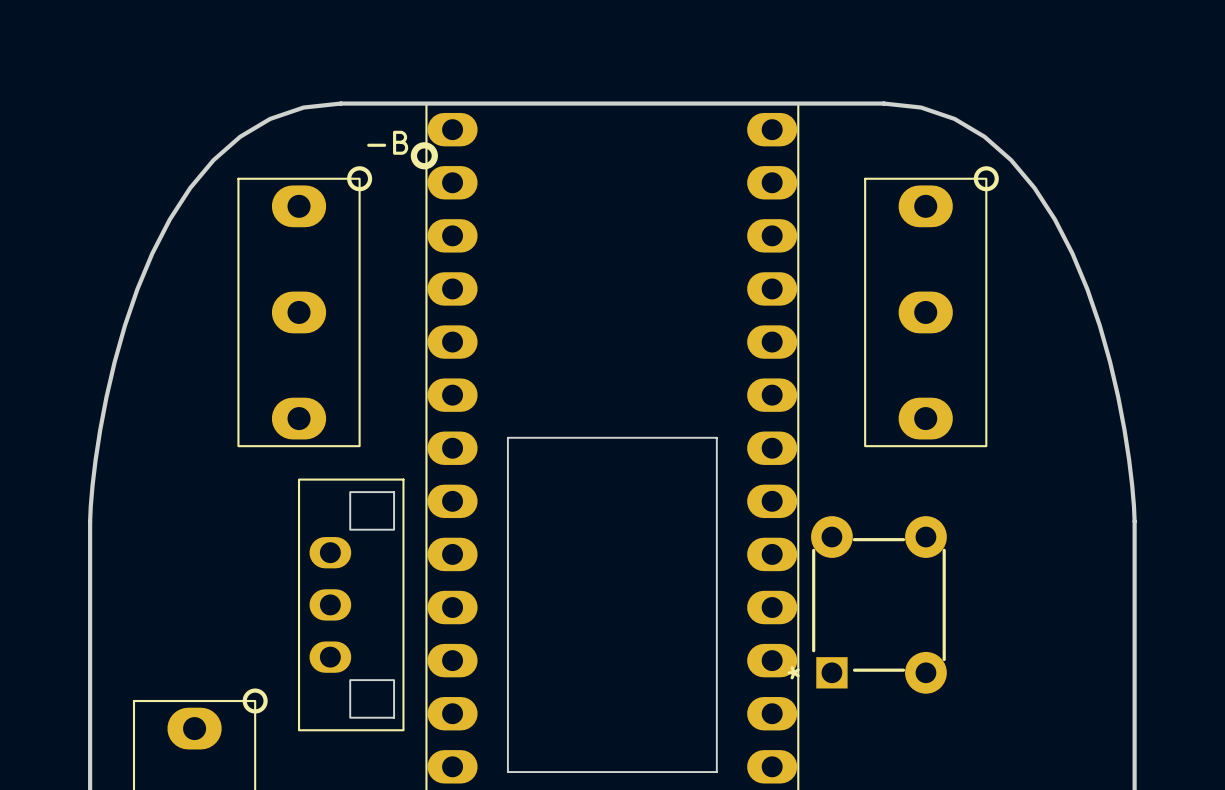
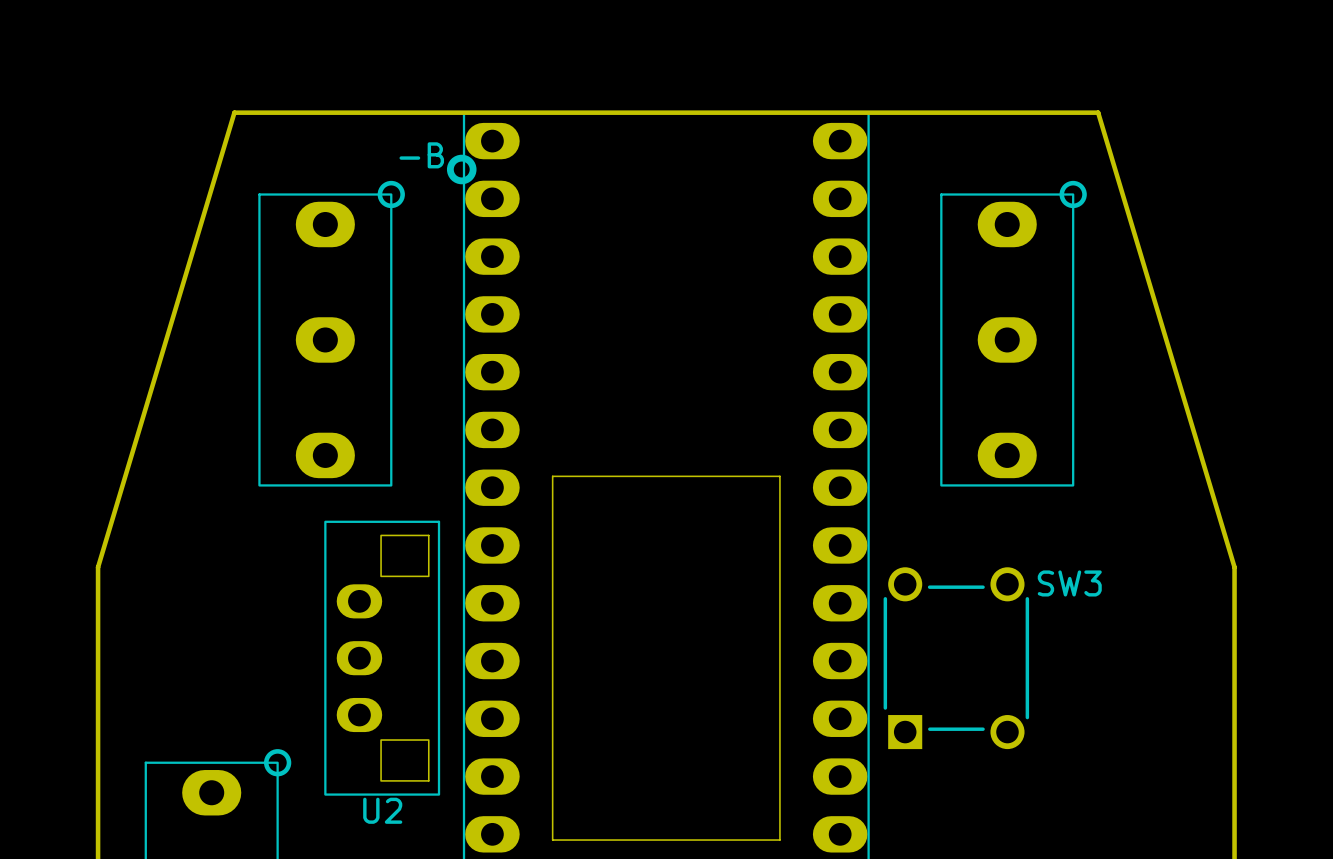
board edge: (340, 103) (303, 107) (270, 118) (240, 136) (213, 160) (190, 187) (169, 219) (152, 253) (137, 289) (114, 361) (100, 429) (92, 485) (90, 521) -> (370, 112) (234, 112) (98, 567)
board edge: (883, 103) (921, 107) (954, 118) (984, 136) (1011, 160) (1034, 187) (1054, 219) (1072, 253) (1087, 289) (1110, 361) (1124, 429) (1132, 485) (1134, 521) -> (961, 112) (1098, 112) (1234, 567)
part: (878, 604) -> none
SW3: none -> (956, 658)
U2 name: none -> U2 (382, 810)

